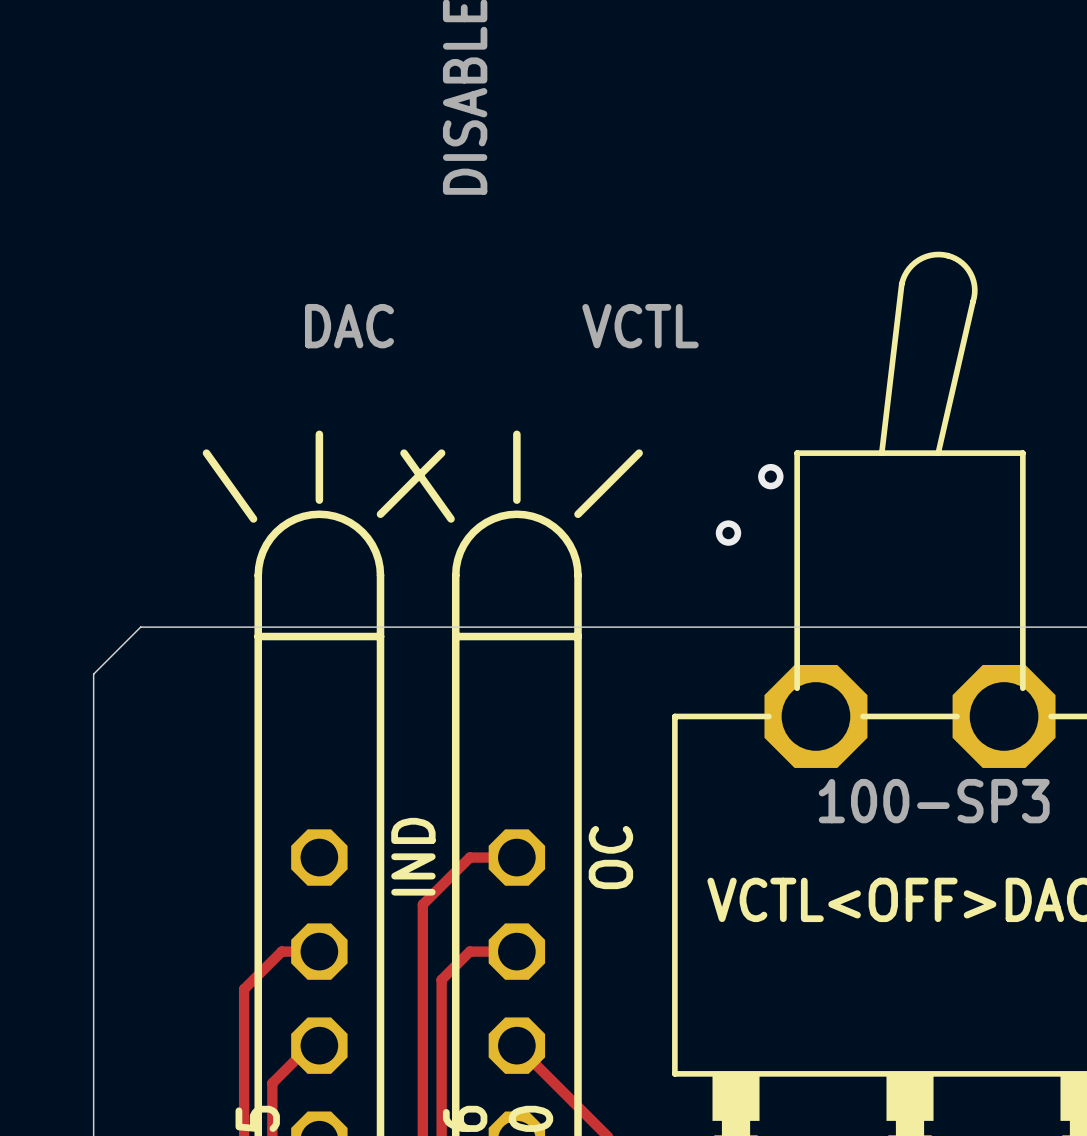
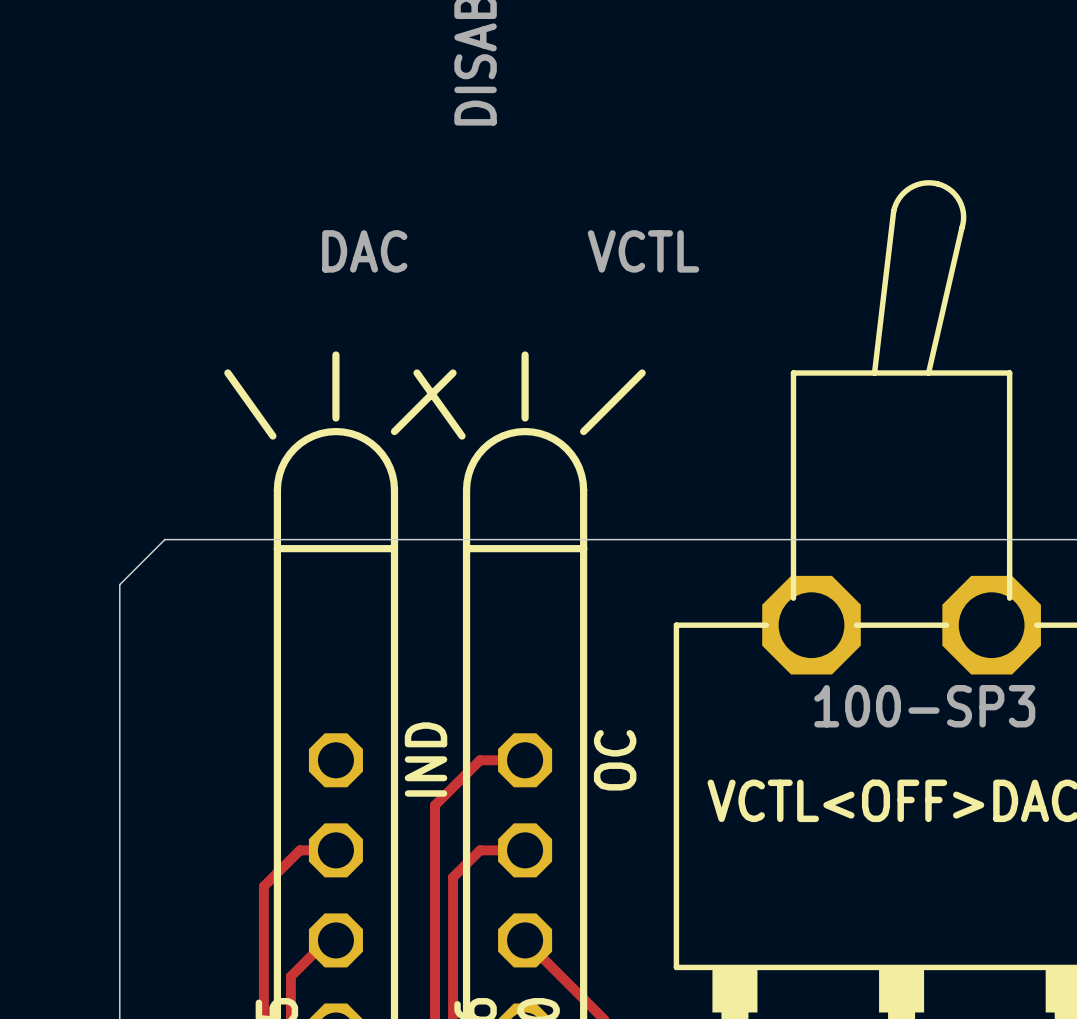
via: (770, 476) -> none
via: (728, 533) -> none

